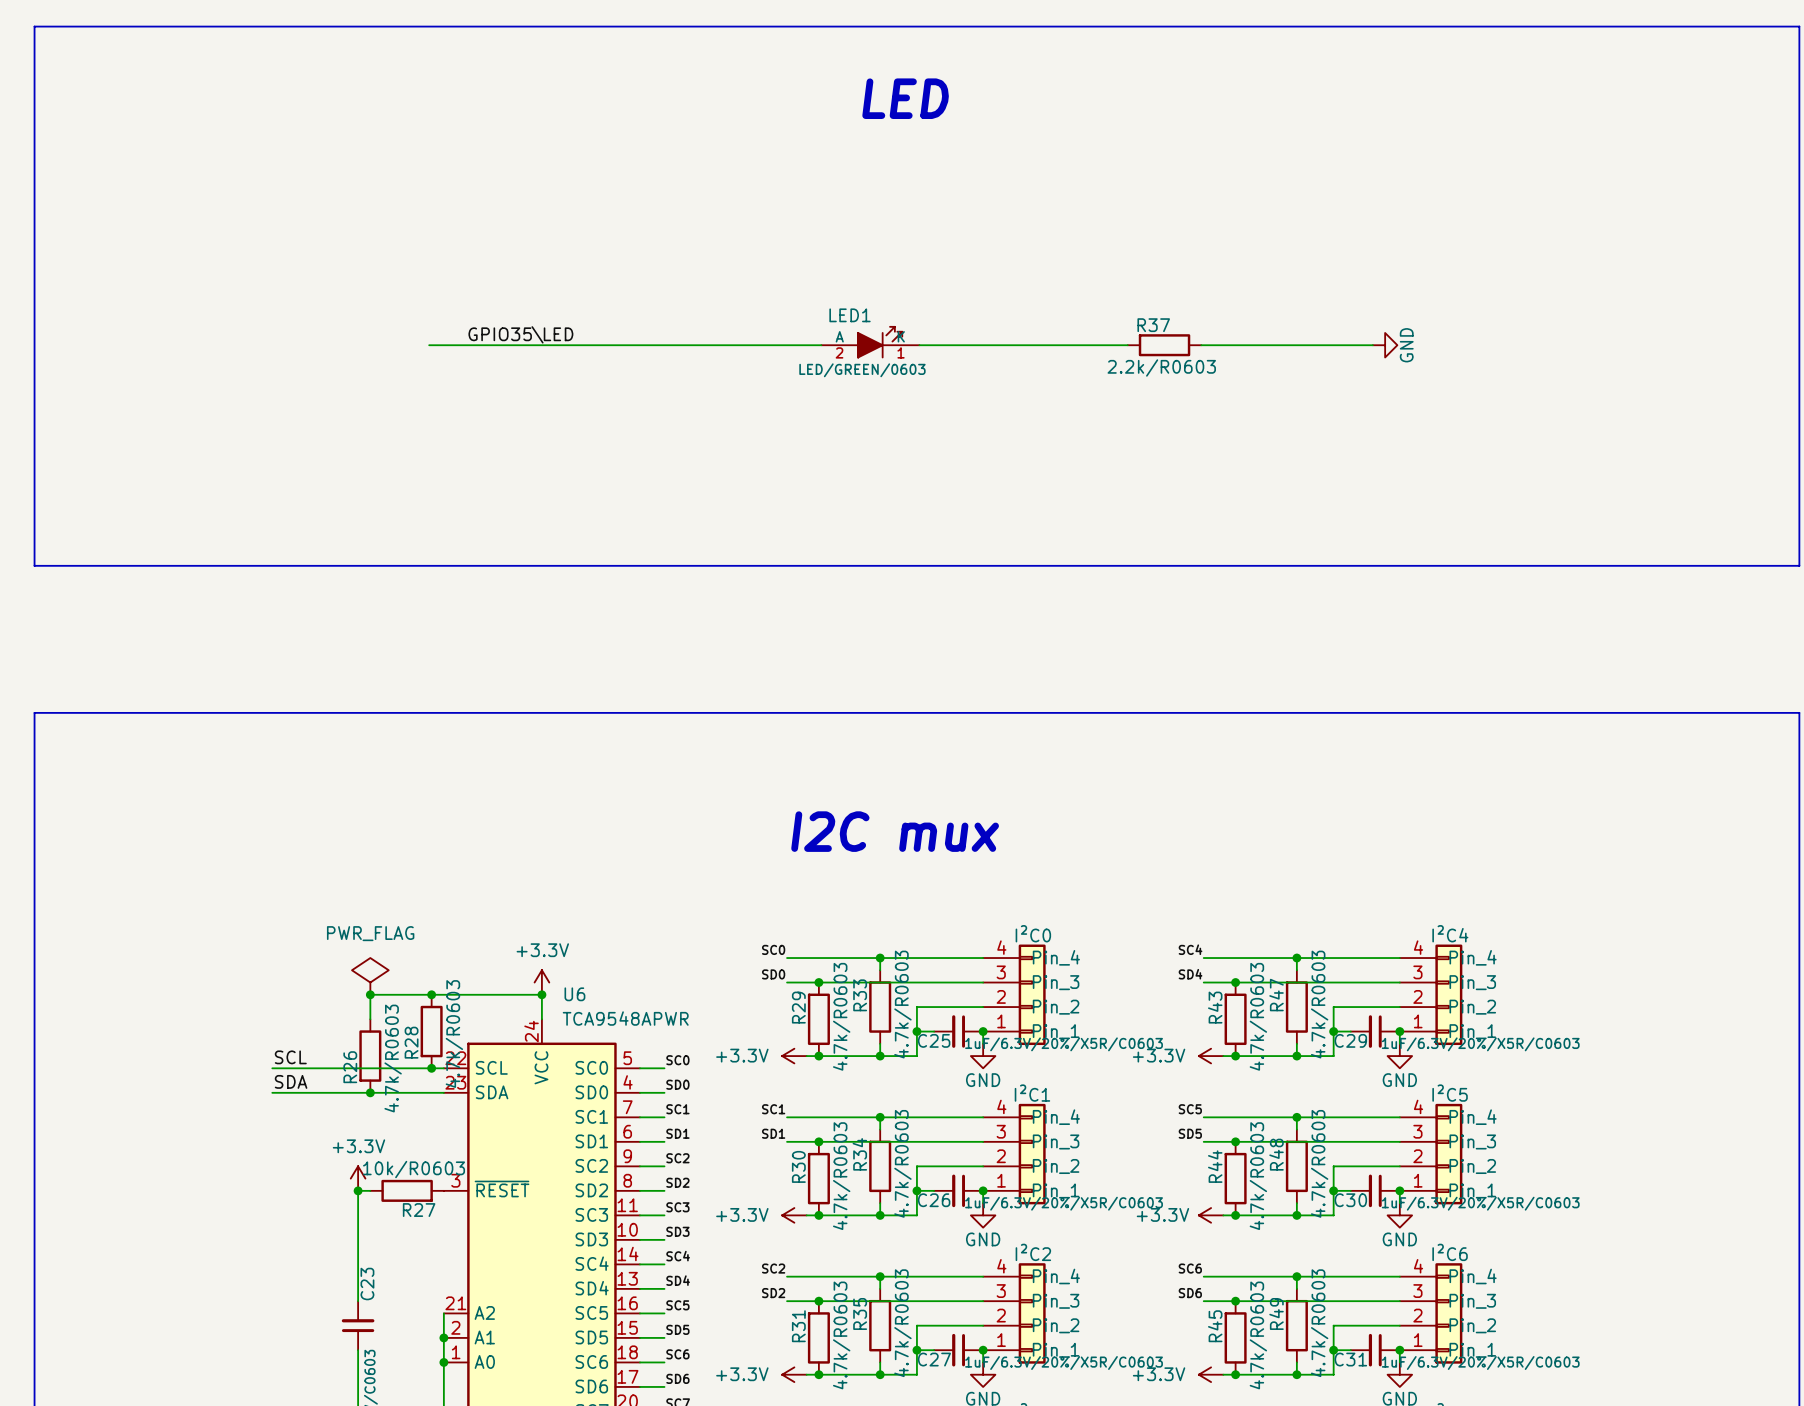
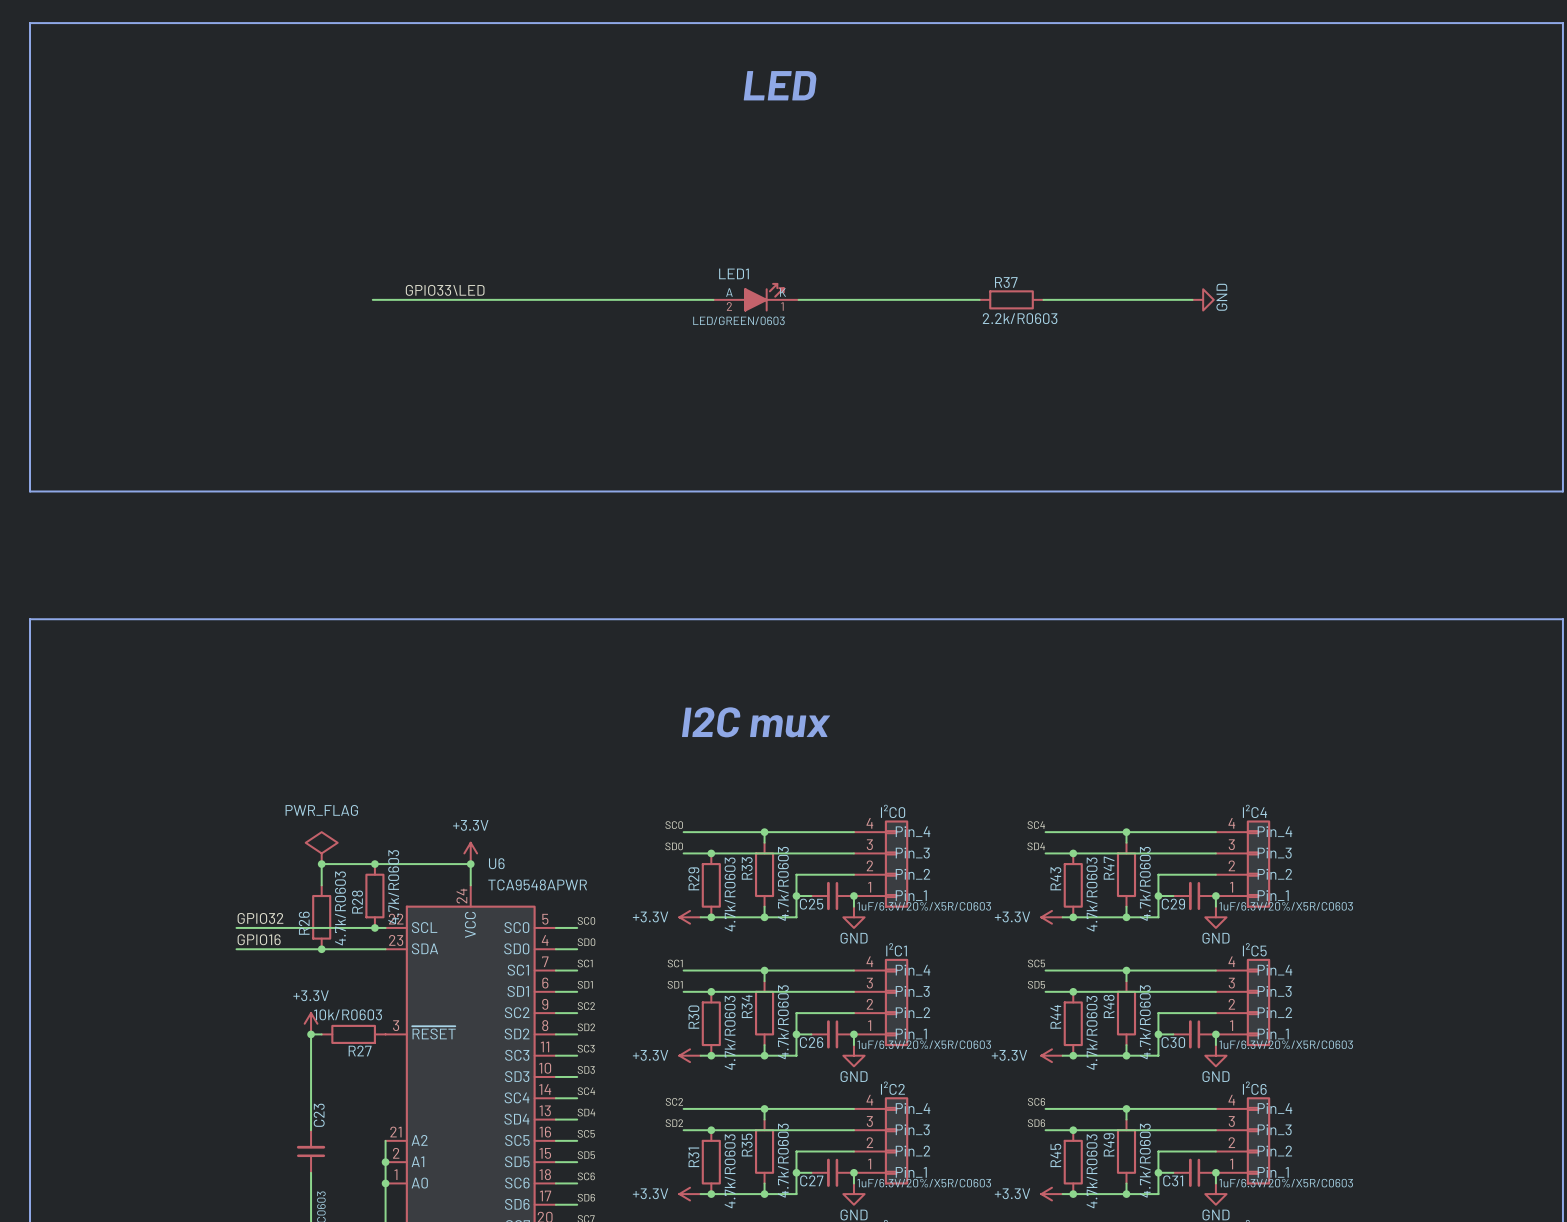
label: GPIO35\LED (520, 334) -> GPIO33\LED (445, 290)
label: SCL (290, 1057) -> GPIO32 (260, 918)
label: SDA (291, 1081) -> GPIO16 (259, 939)

